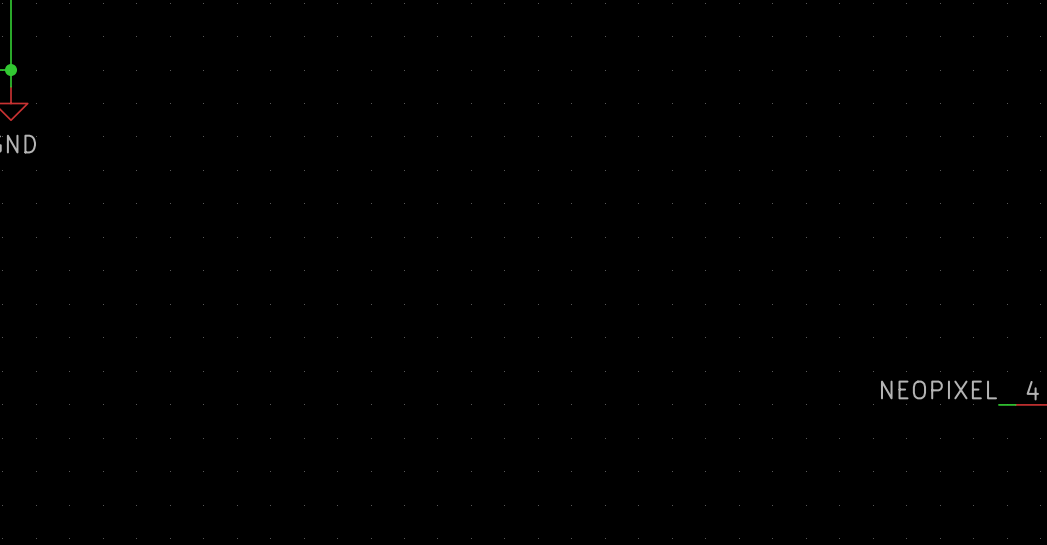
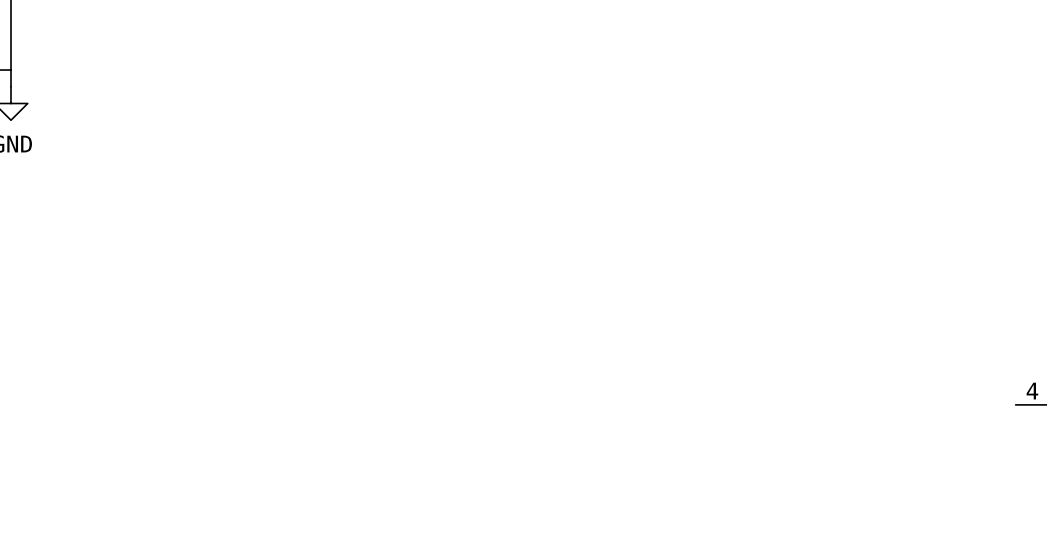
junction: (11, 70) -> none
label: NEOPIXEL (938, 389) -> none
wire: (998, 404) (1015, 404) -> none

